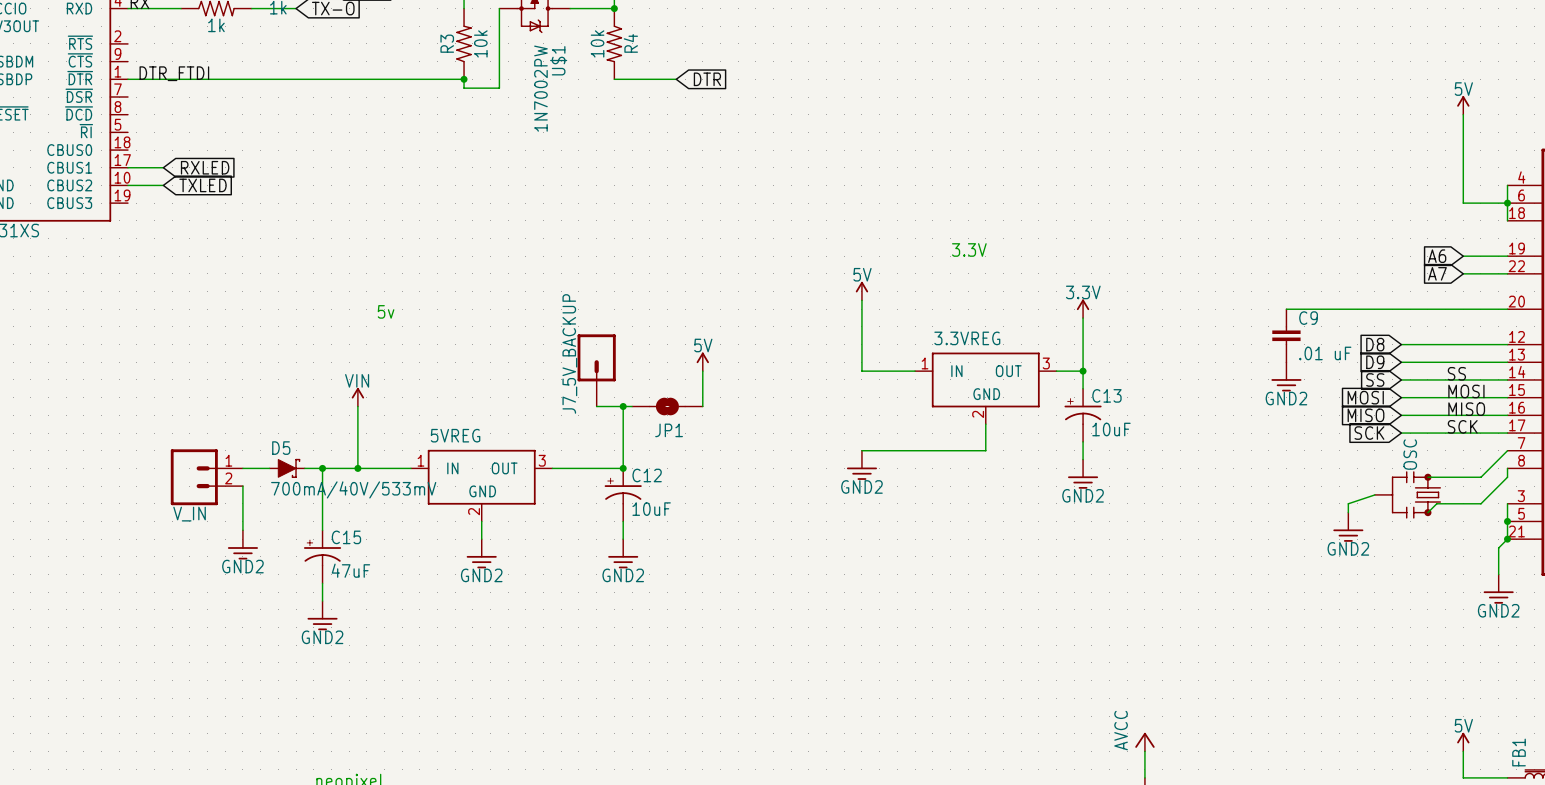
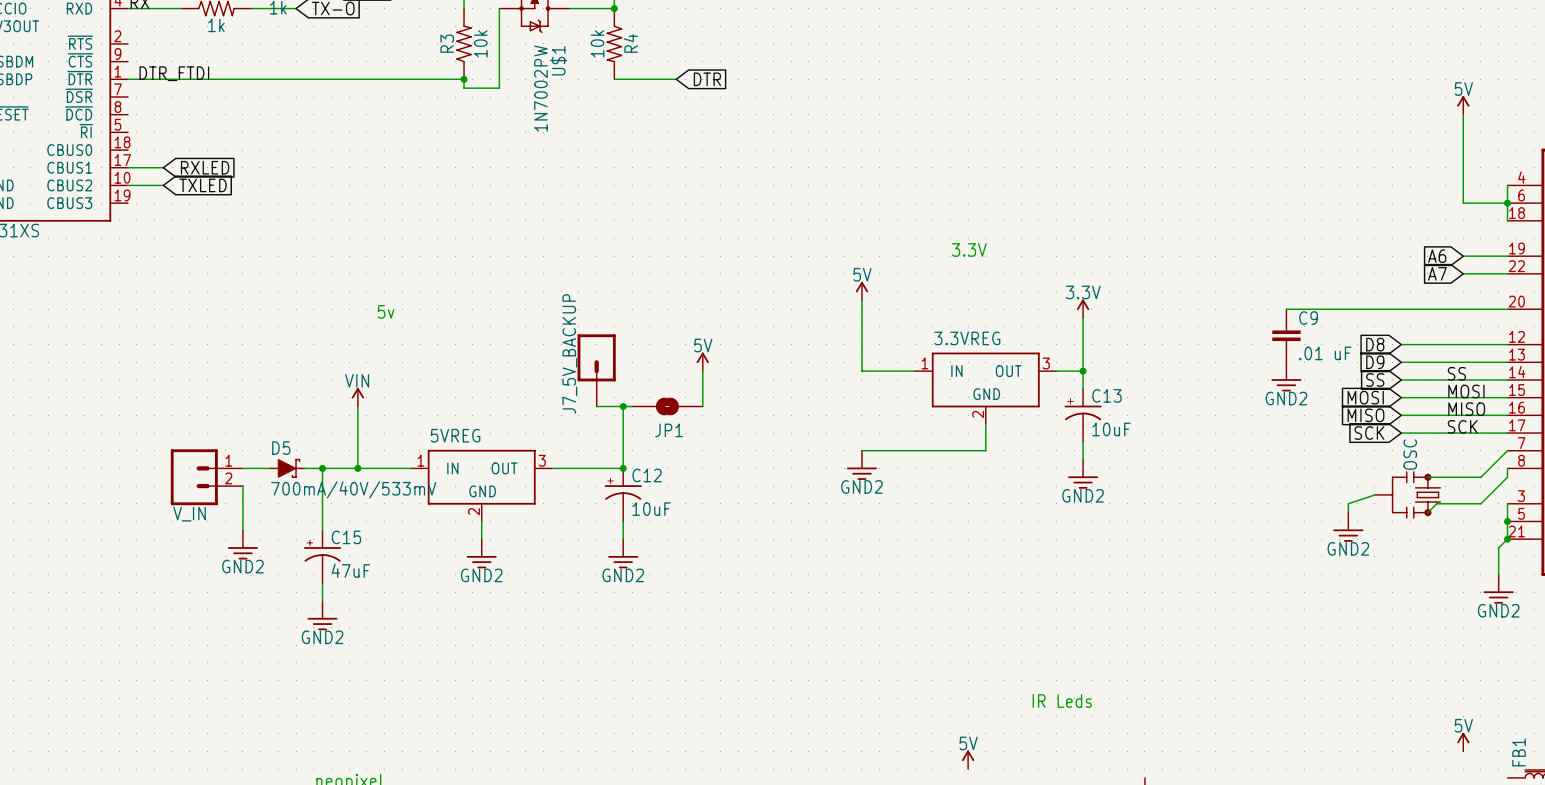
text: none -> IR Leds (1062, 700)
power symbol: AVCC (1144, 742) -> none
wire: (1144, 751) (1144, 777) -> none
wire: (1463, 751) (1463, 777) (1507, 777) -> none
power symbol: none -> 5V (968, 759)

